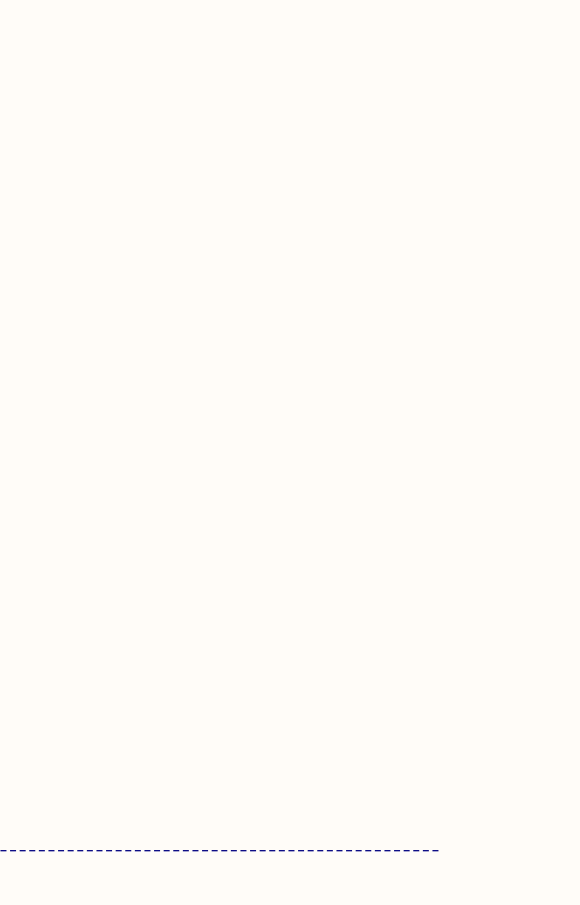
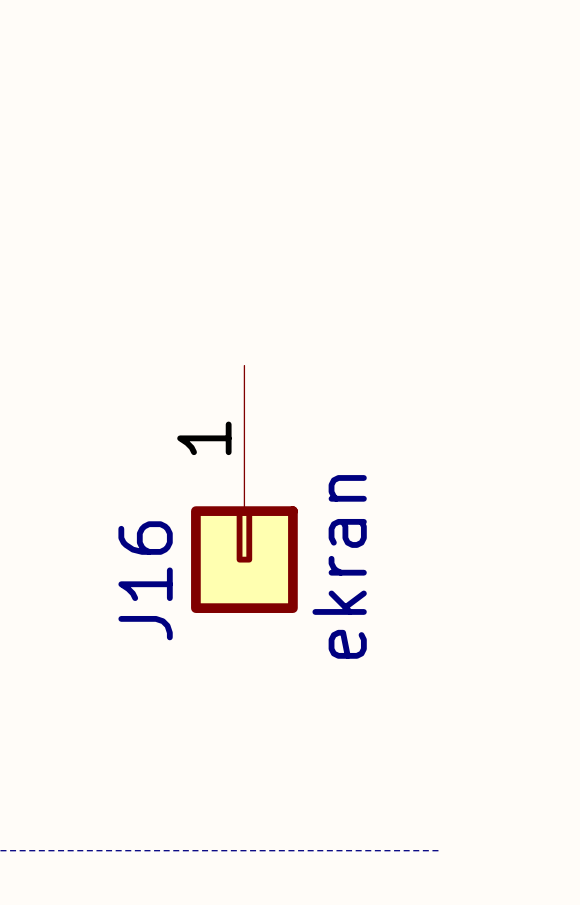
J16: none -> ekran (244, 489)

